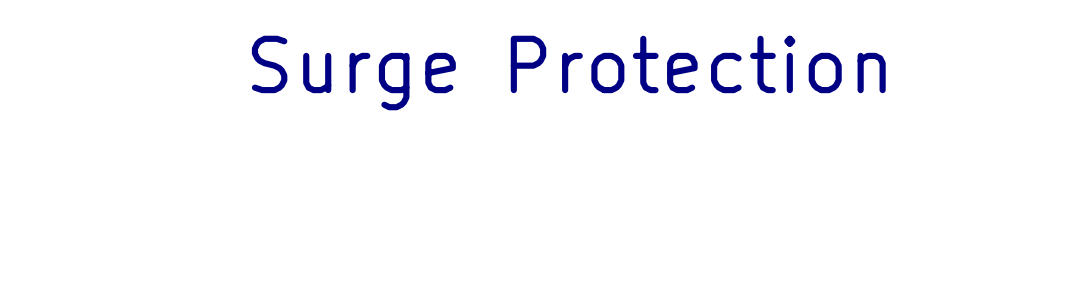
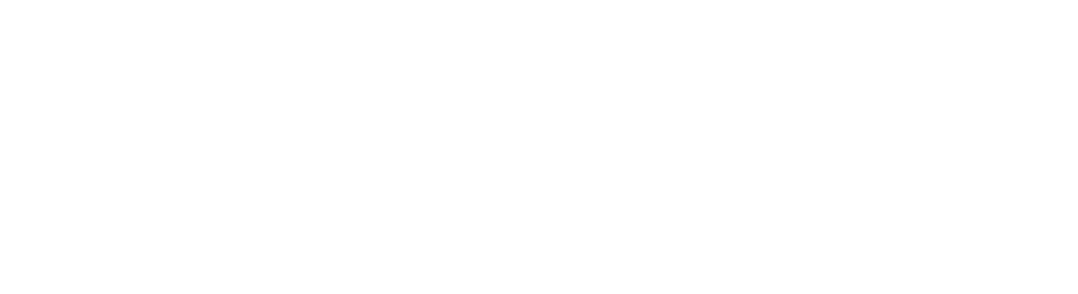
text: Surge Protection (568, 73) -> none

